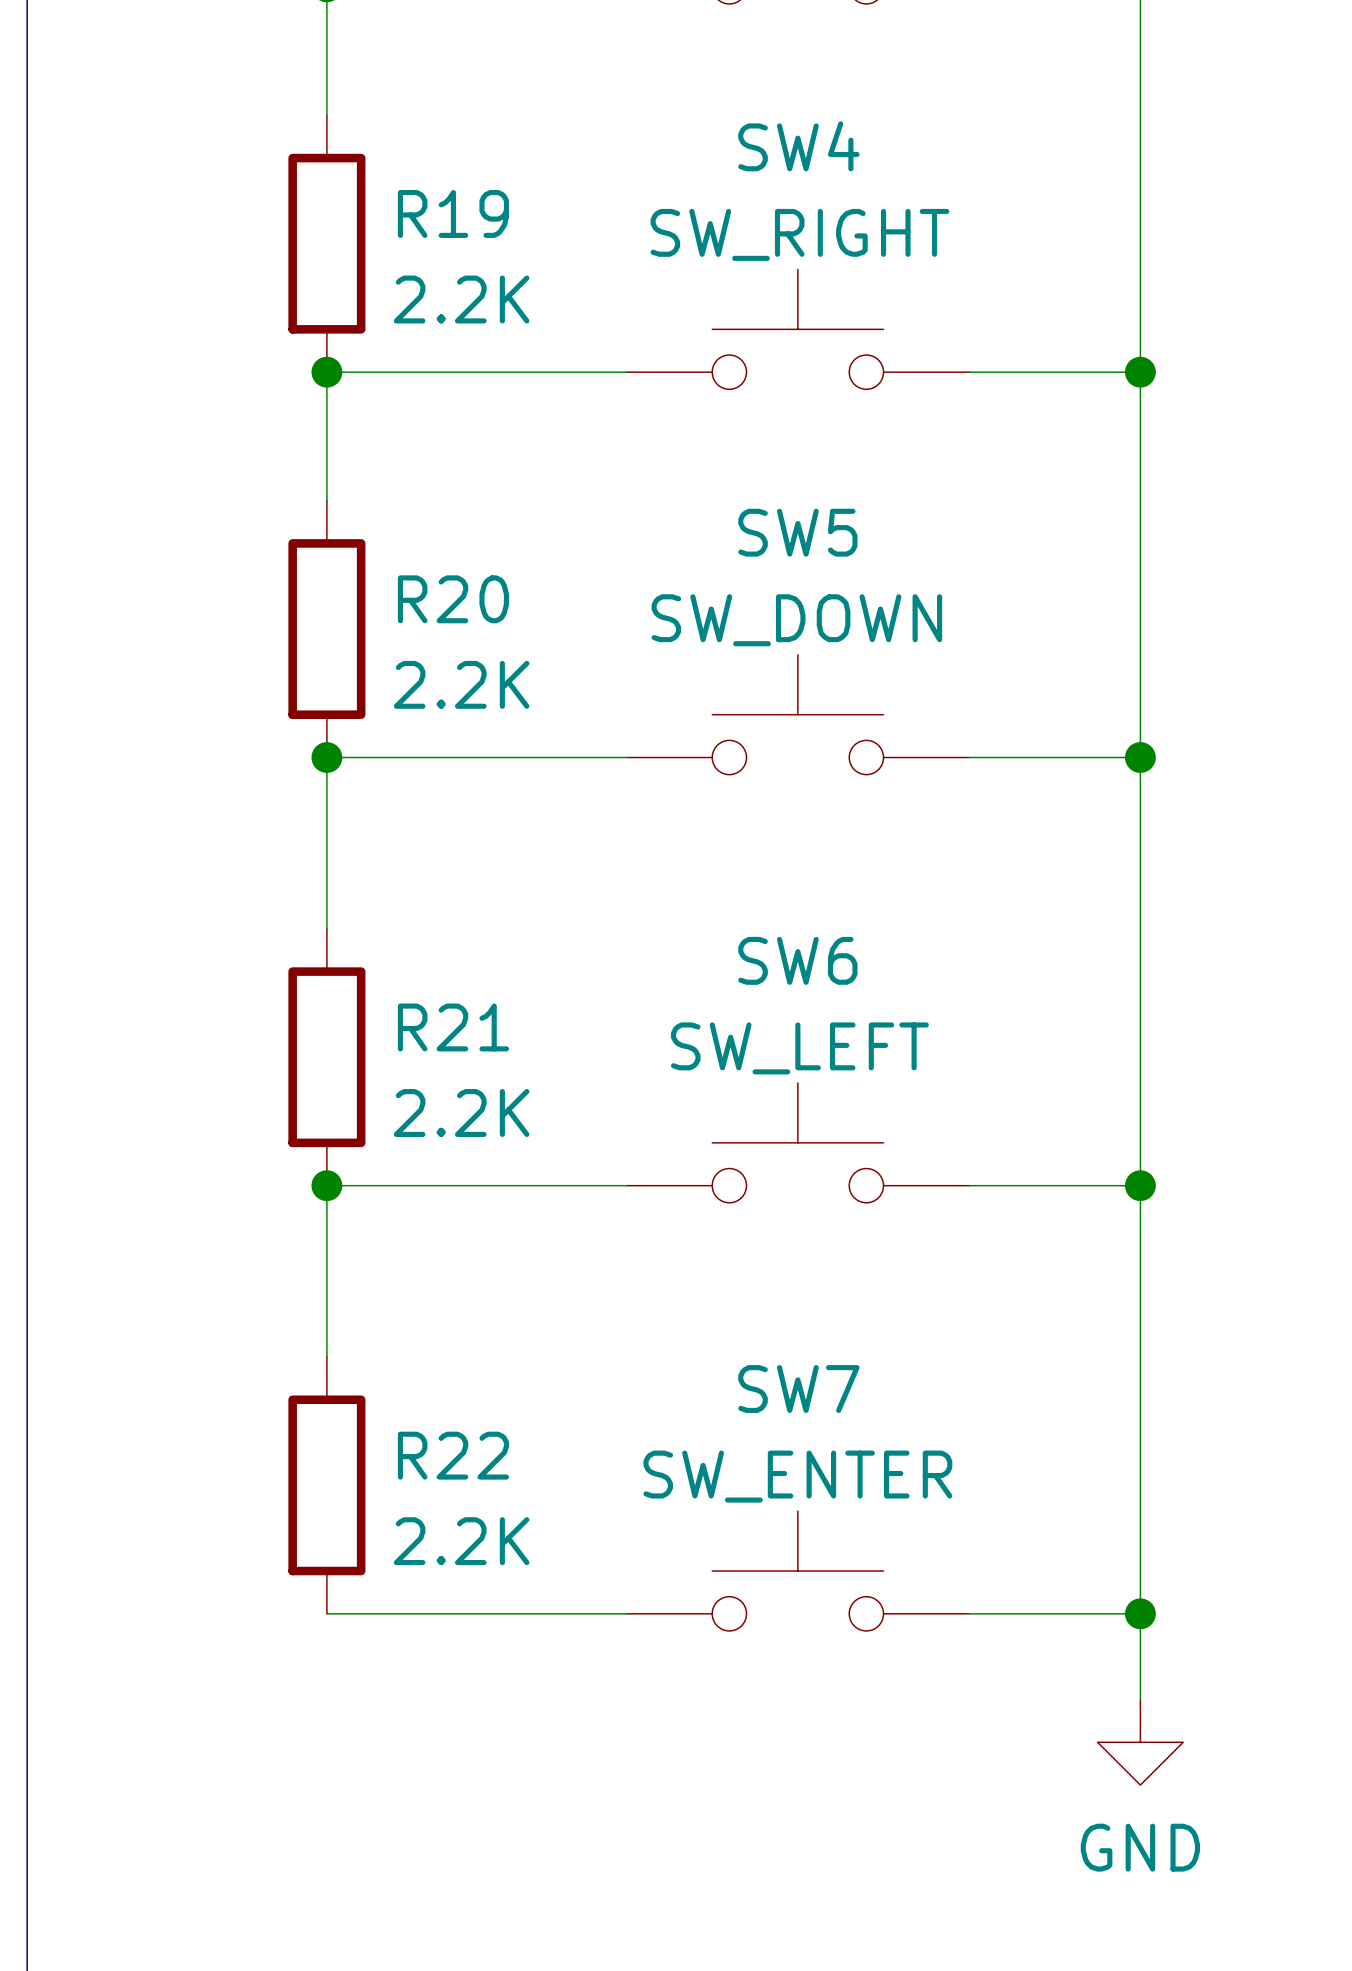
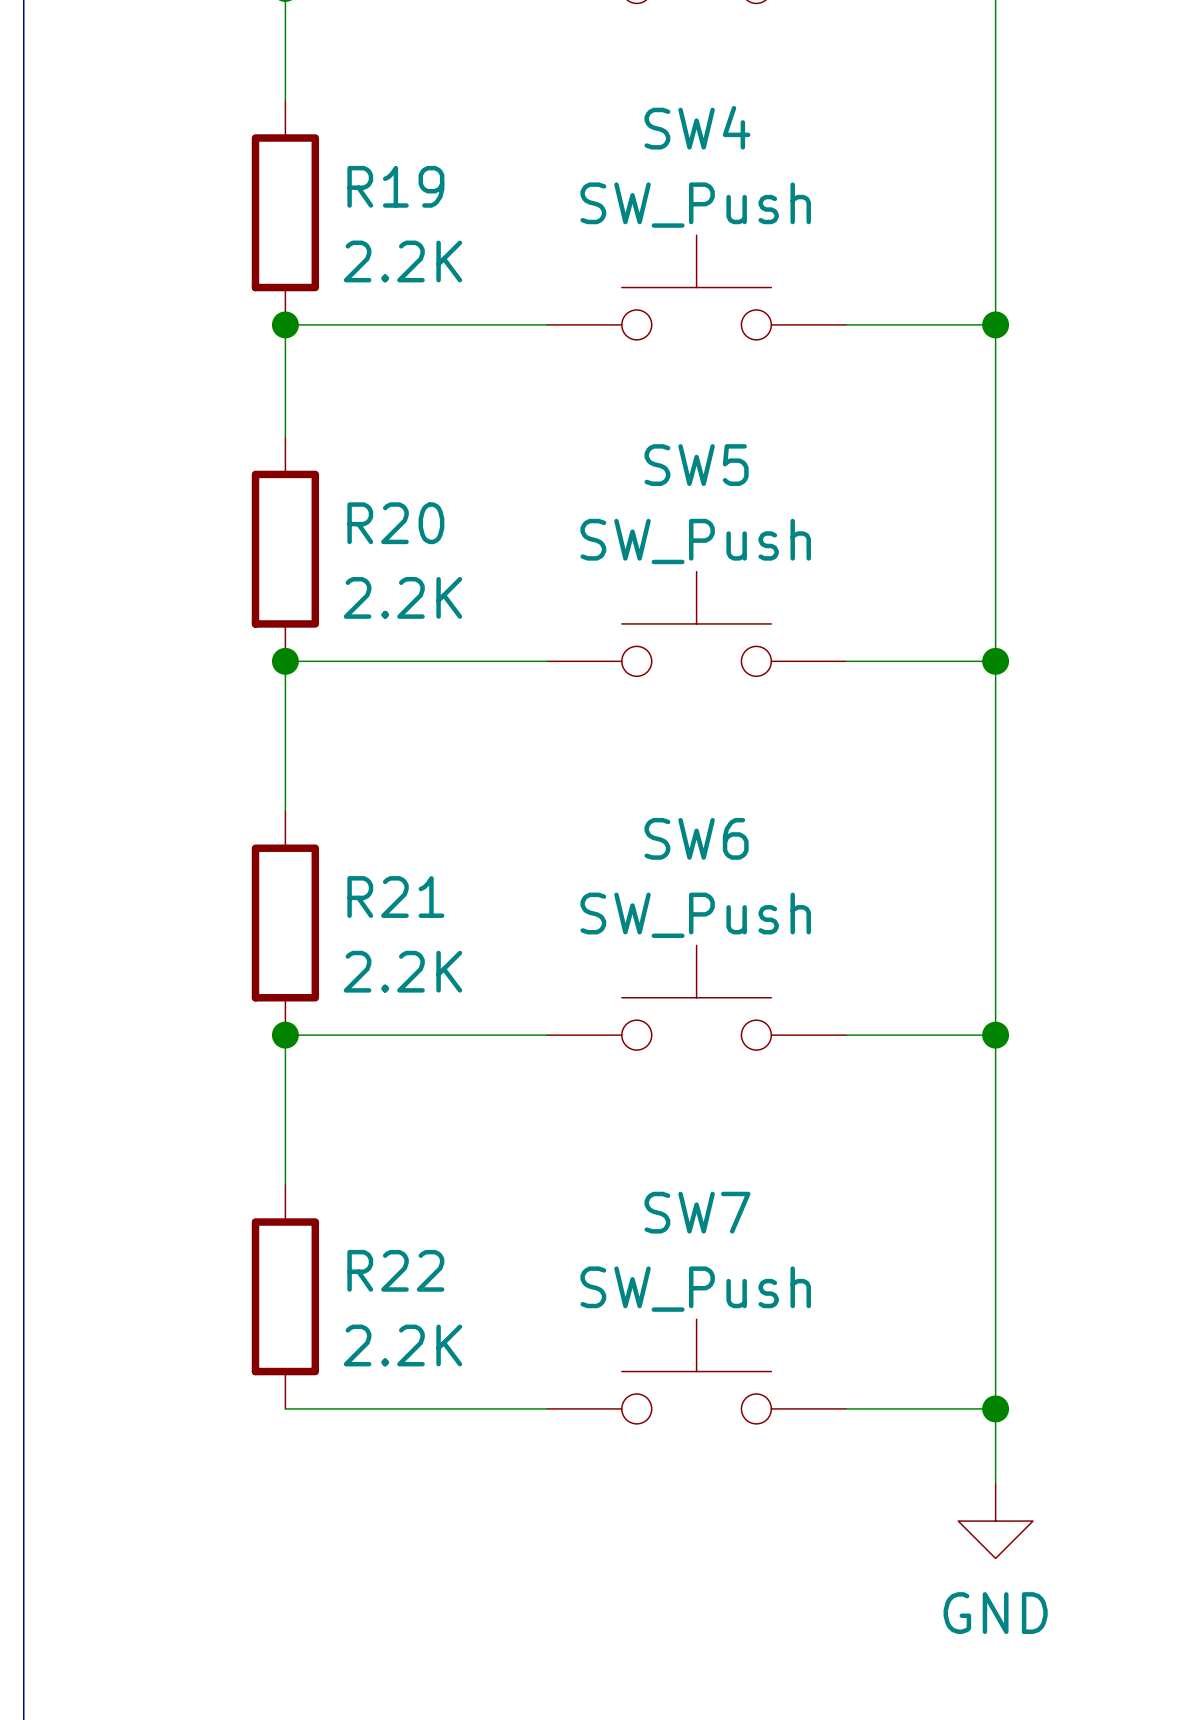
SW4 value: SW_RIGHT (799, 234) -> SW_Push (695, 205)
SW5 value: SW_DOWN (796, 620) -> SW_Push (695, 541)
SW6 value: SW_LEFT (799, 1048) -> SW_Push (695, 915)
SW7 value: SW_ENTER (797, 1476) -> SW_Push (695, 1289)

